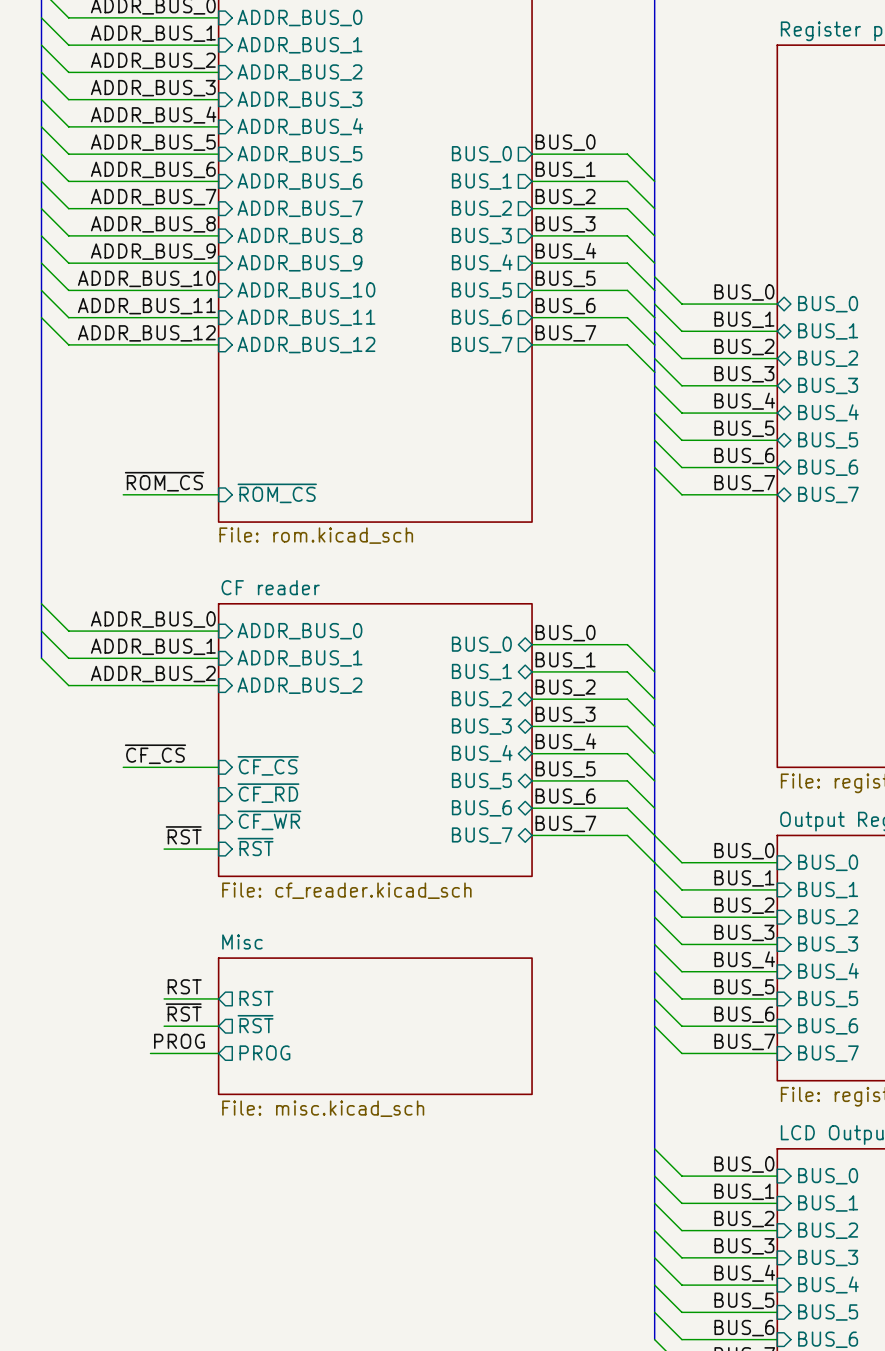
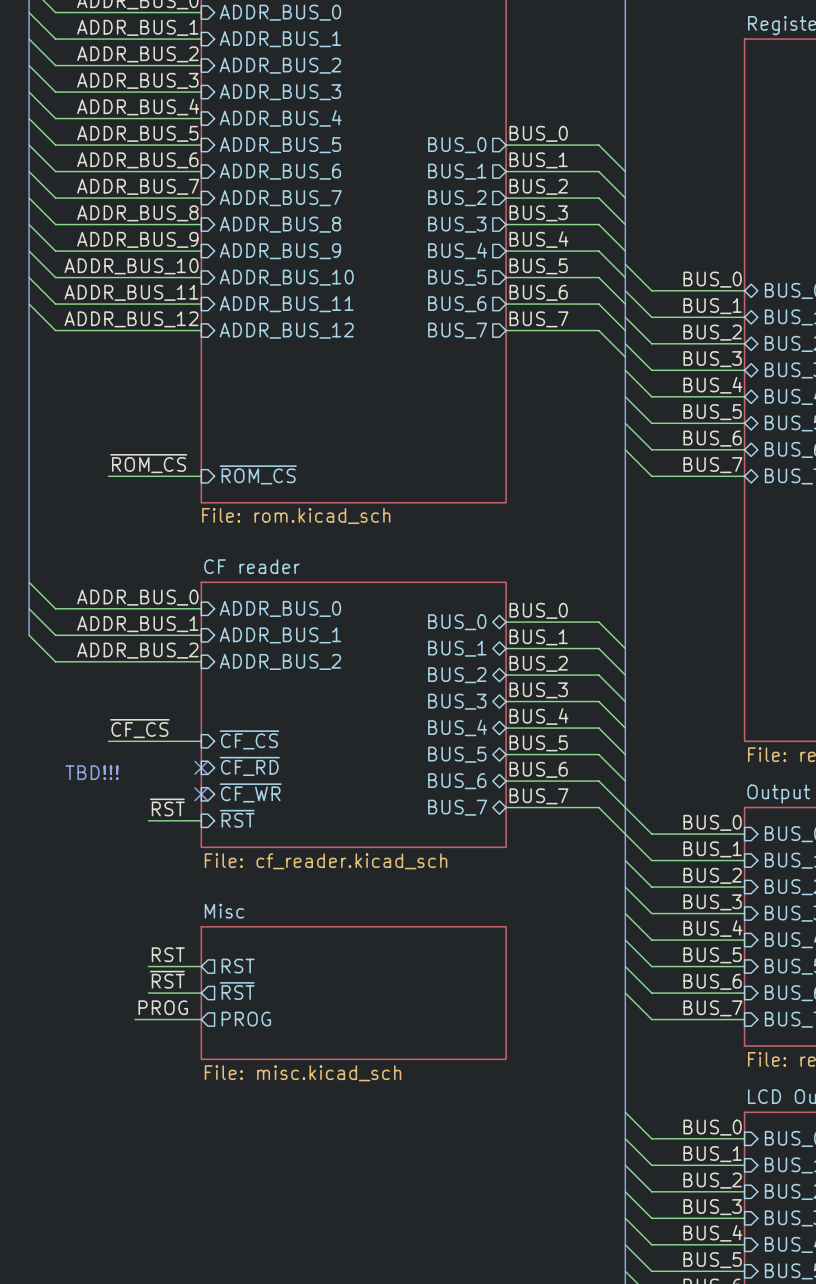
no-connect mark: none -> (201, 767)
text: none -> TBD!!! (92, 772)
no-connect mark: none -> (201, 794)

